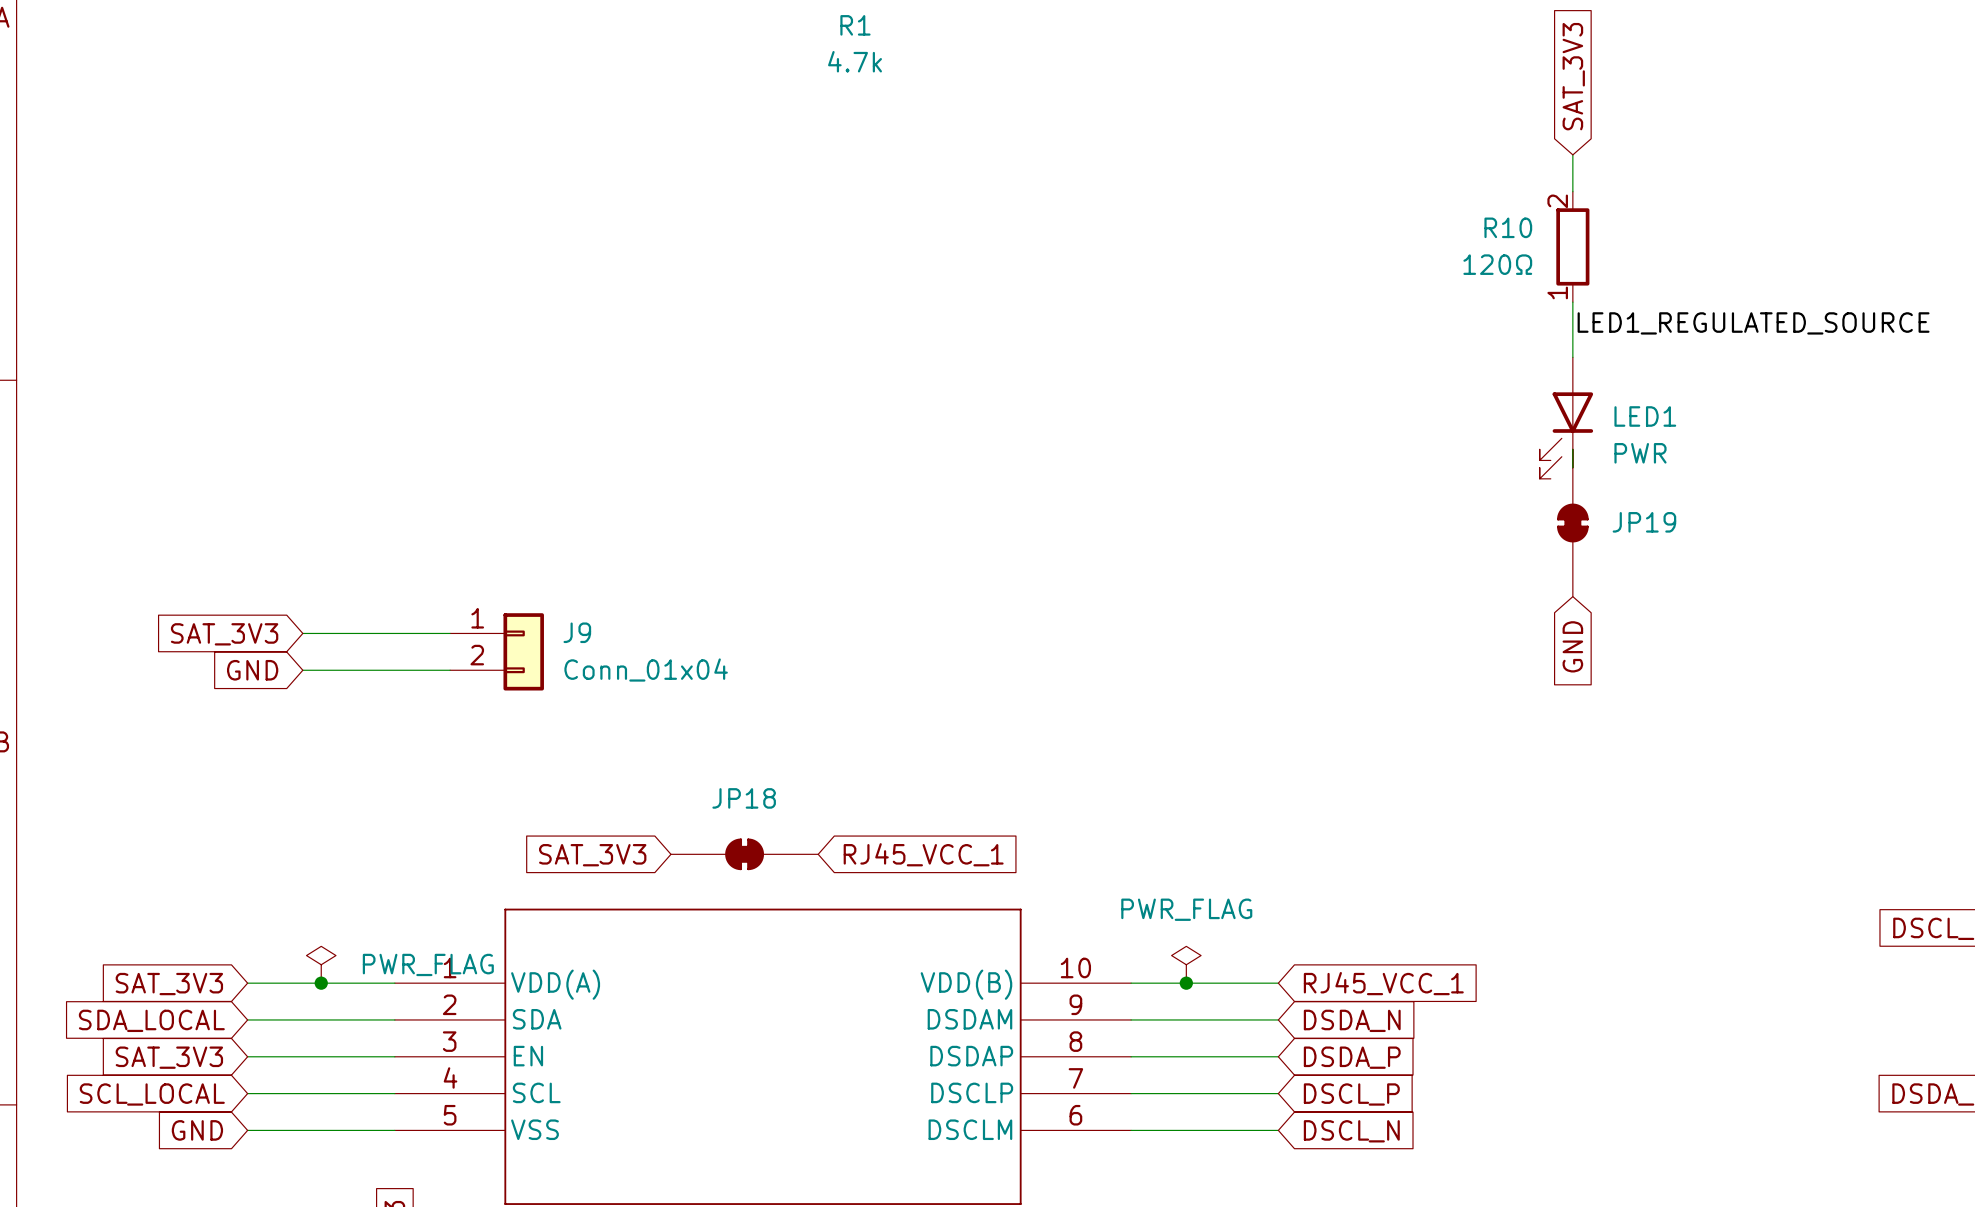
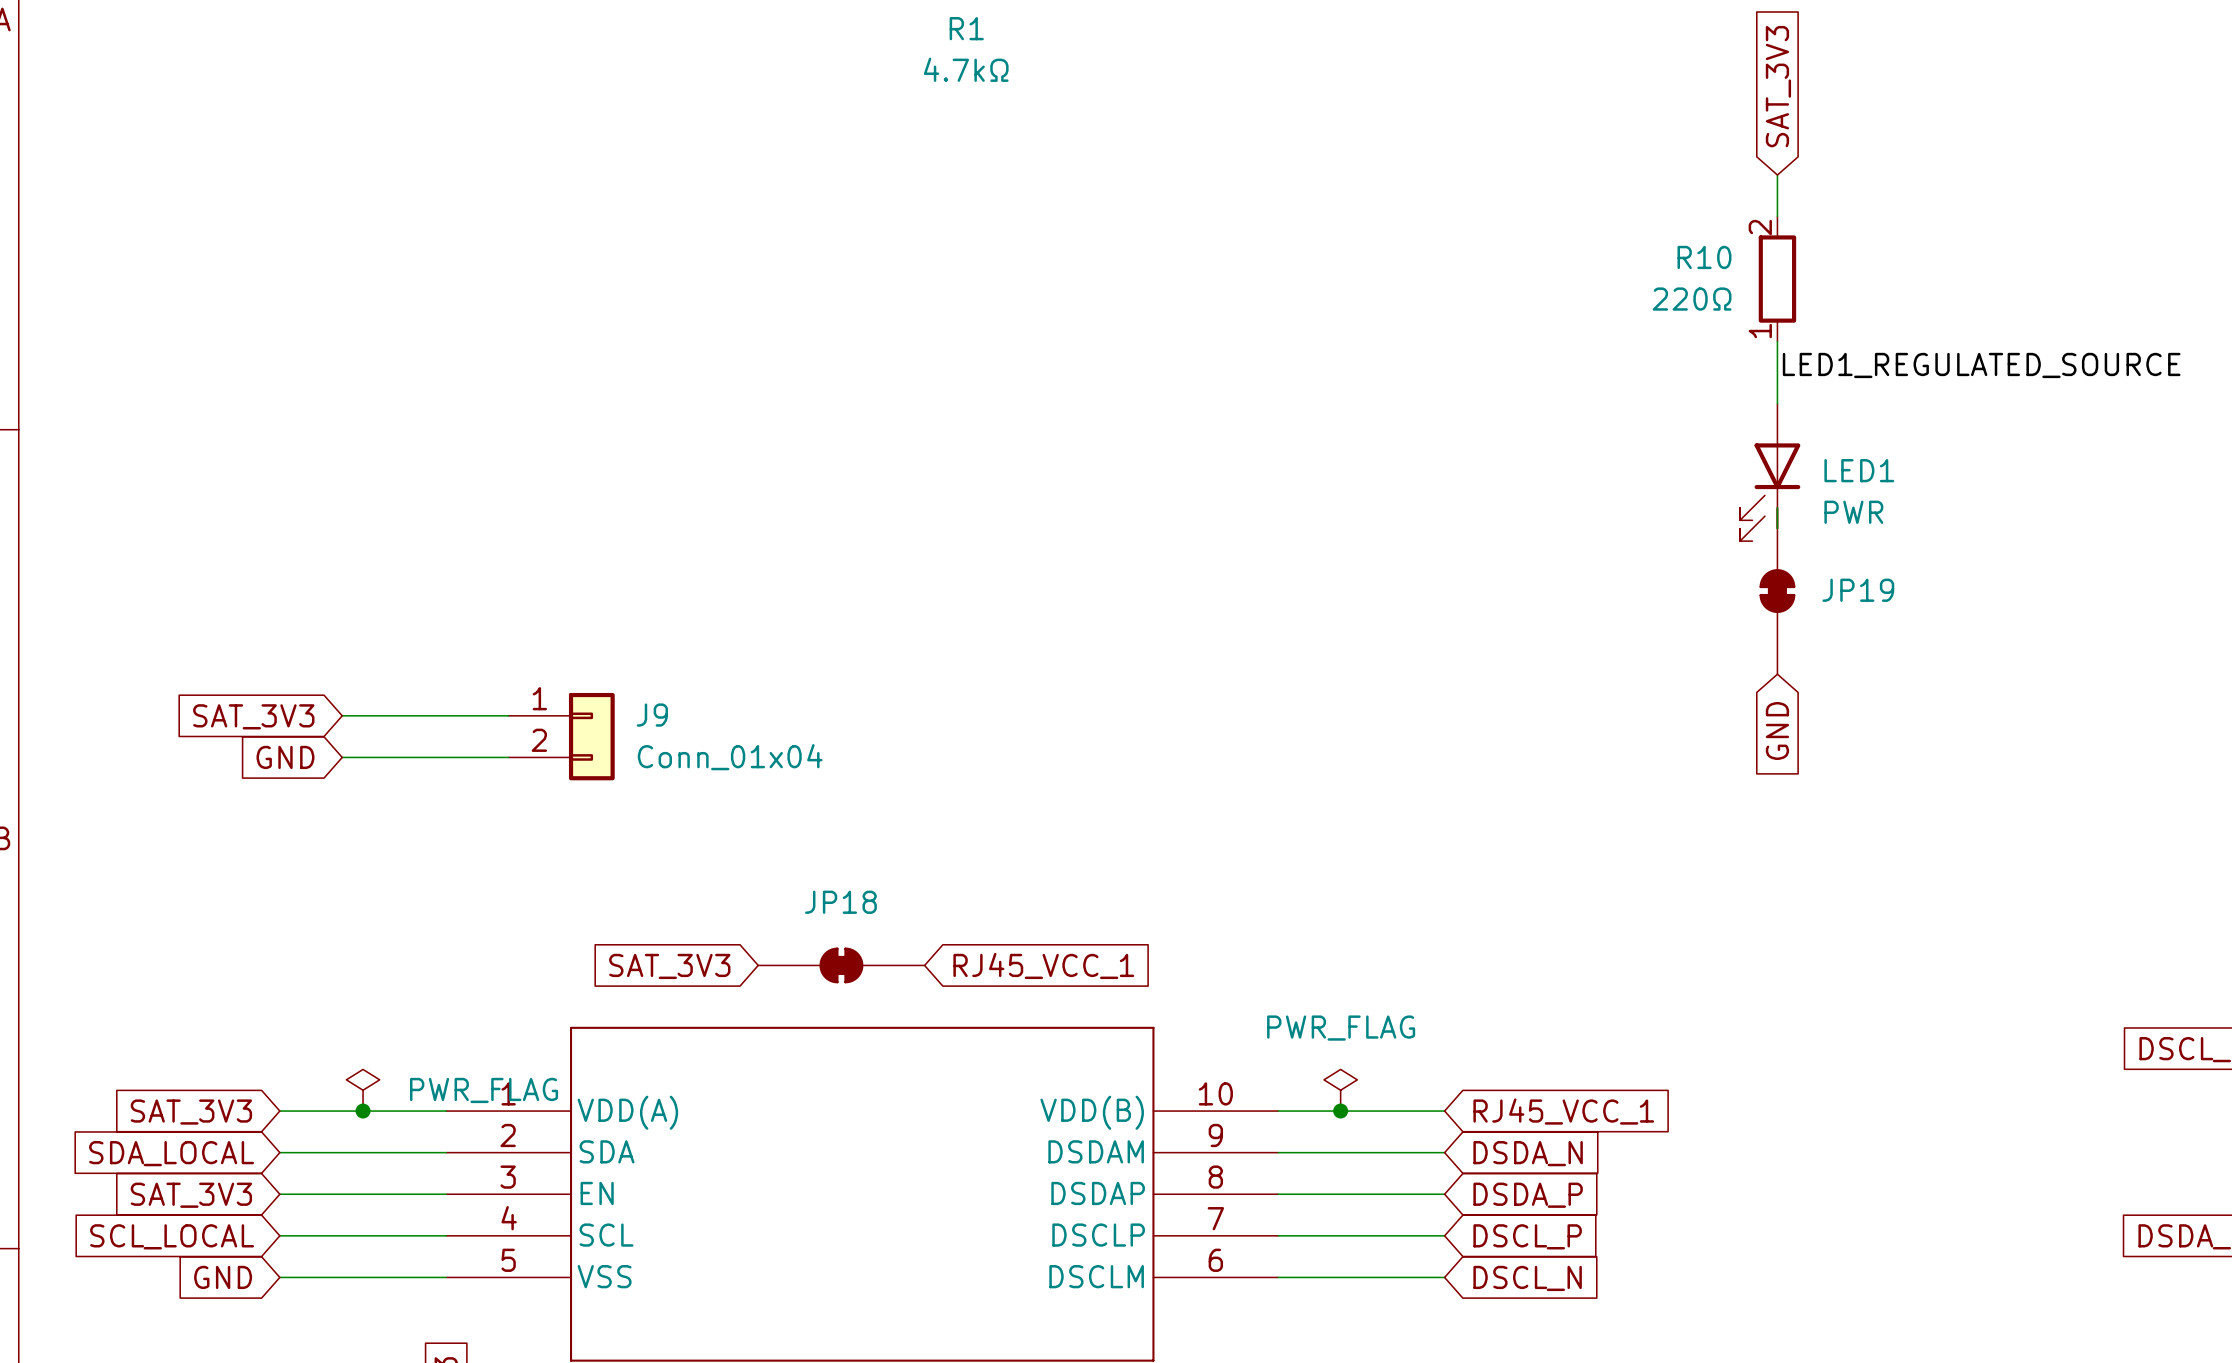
R1 value: 4.7k (855, 61) -> 4.7kΩ (966, 69)
R10 value: 120Ω (1497, 264) -> 220Ω (1692, 299)

